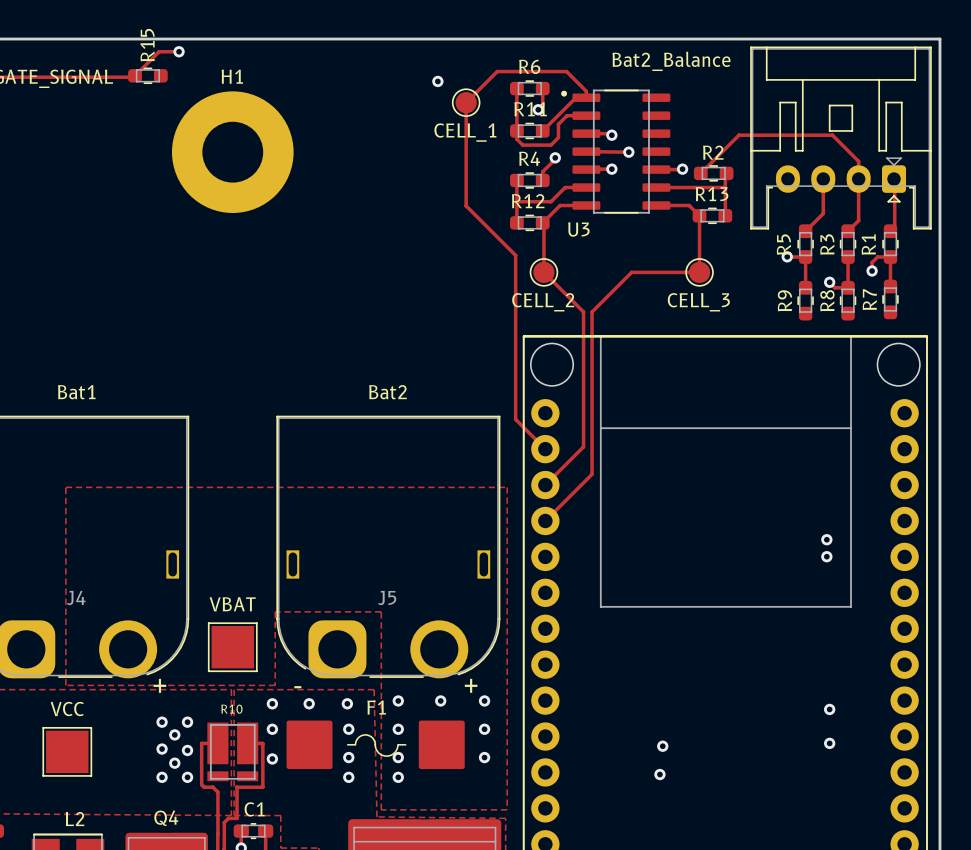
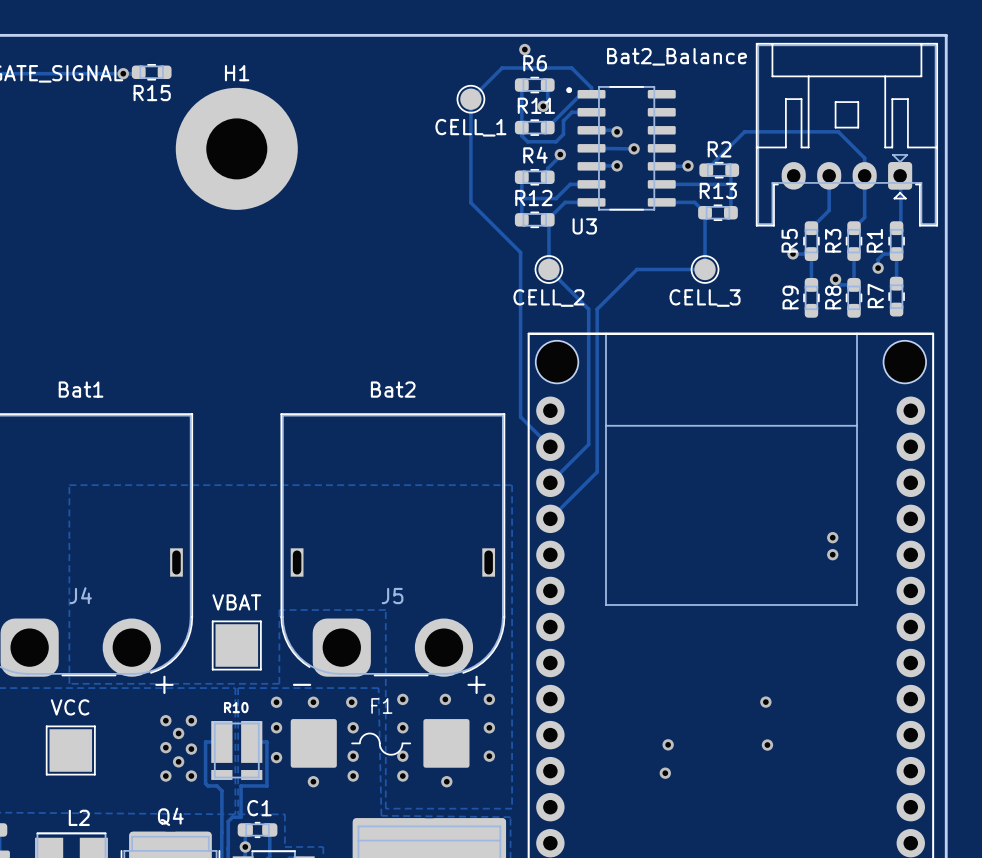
R15 name rotation: 0° (147, 45) -> 90° clockwise (152, 93)
R15 name position: R15 (147, 45) -> R15 (152, 93)
track: (179, 51) (159, 51) (135, 75) -> none
via position: (179, 51) -> (123, 73)
via: none -> (524, 49)
via: (437, 81) -> none
via: none -> (765, 702)
via: (829, 709) -> none
via: (829, 743) -> none
via: none -> (767, 745)
via: none -> (313, 781)
via: none -> (446, 781)

